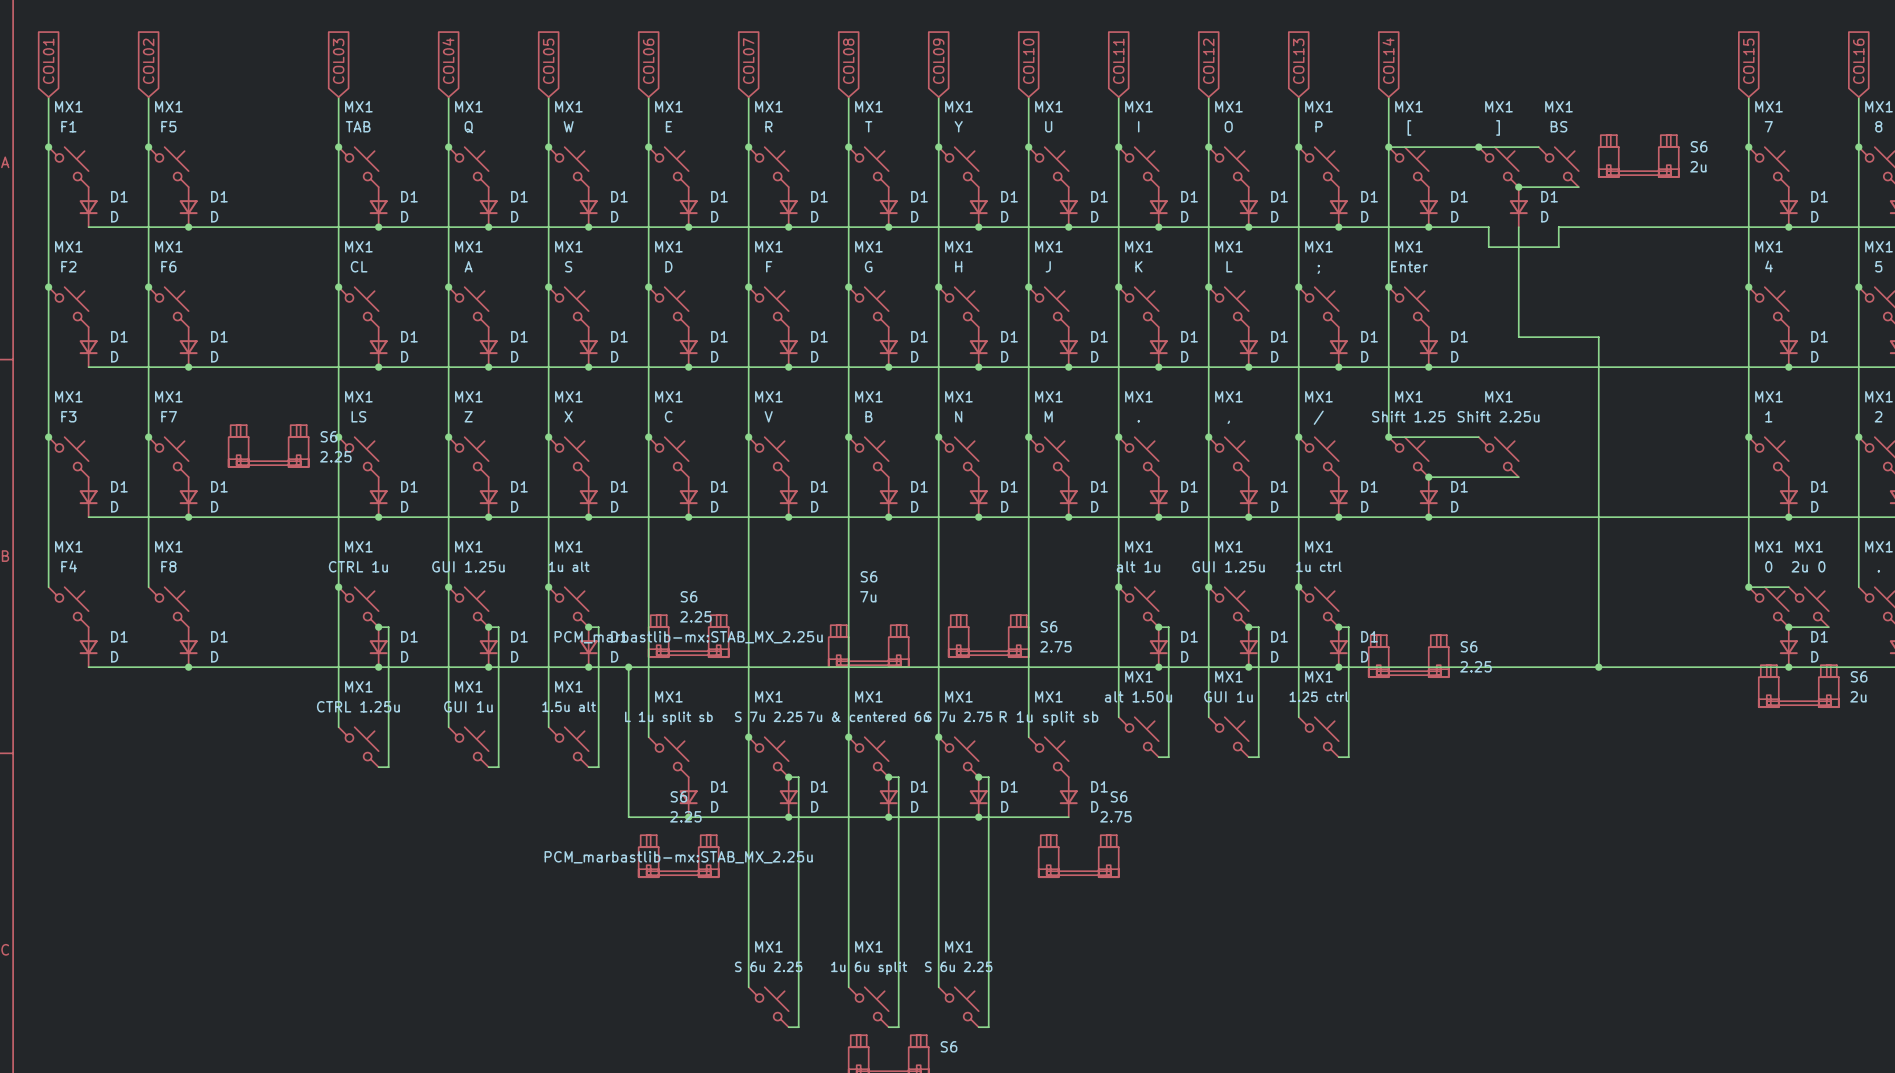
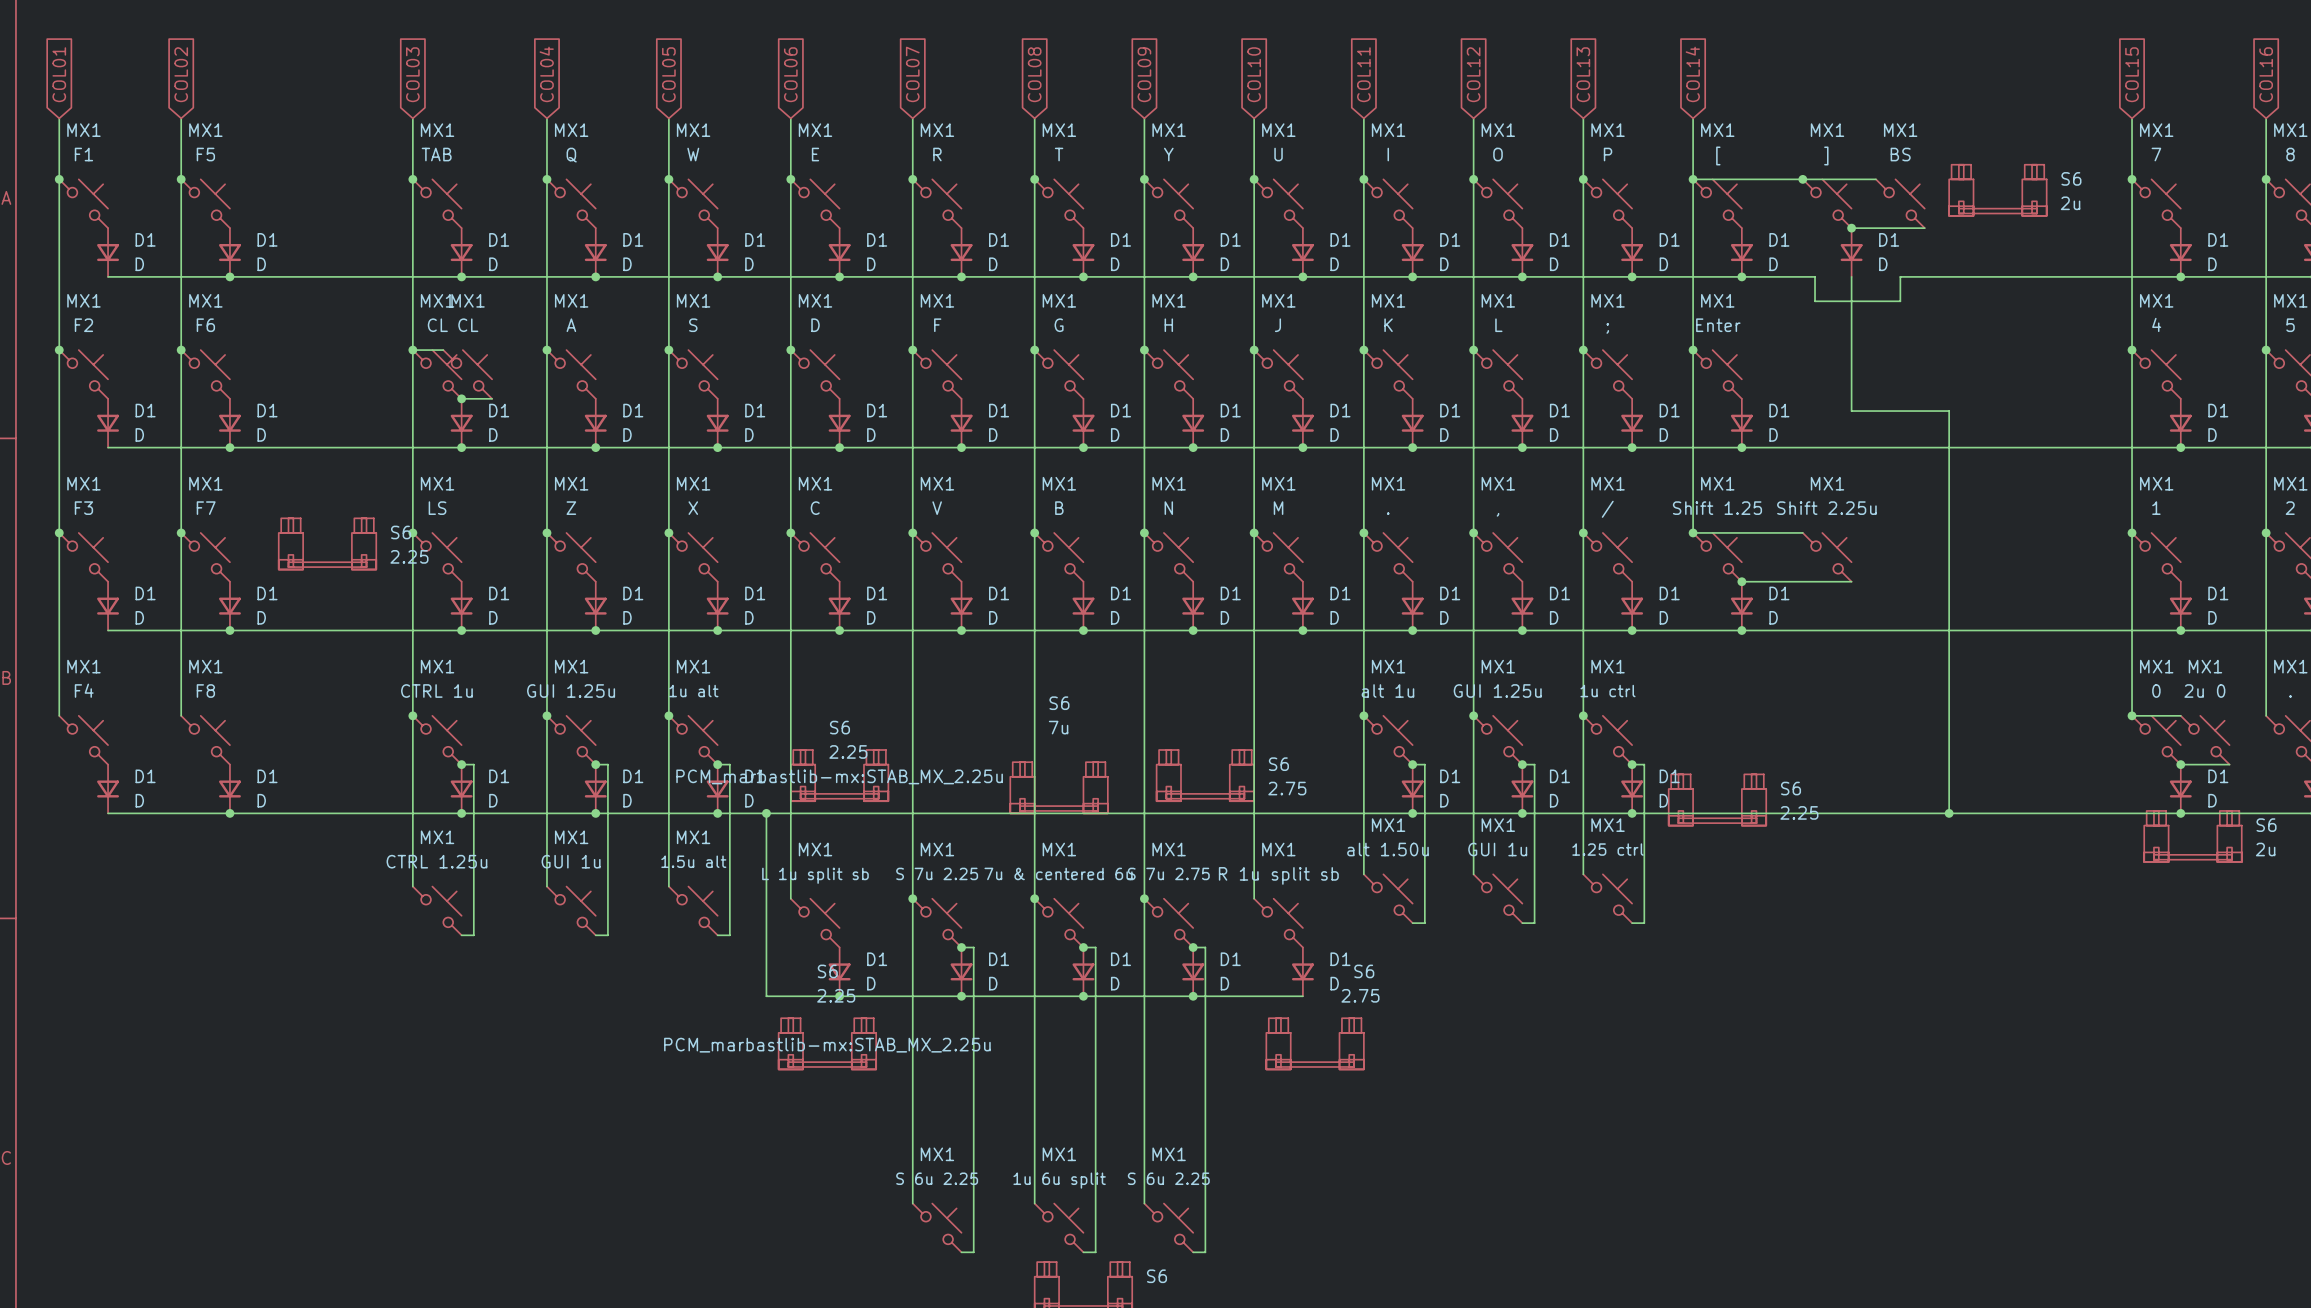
wire: none -> (412, 350) (443, 350)
MX1: none -> CL (467, 374)
wire: none -> (461, 398) (492, 398)
junction: none -> (461, 398)

